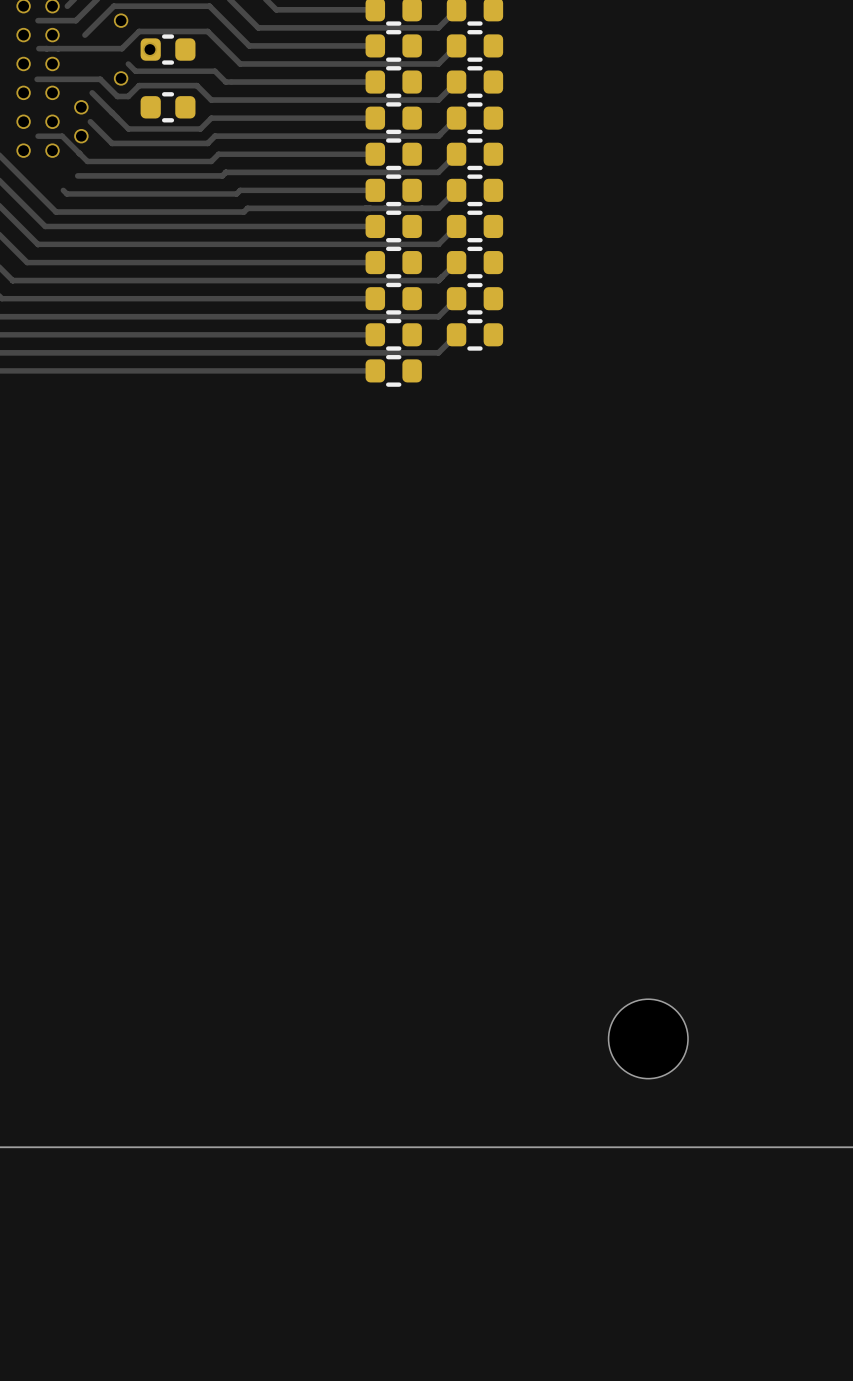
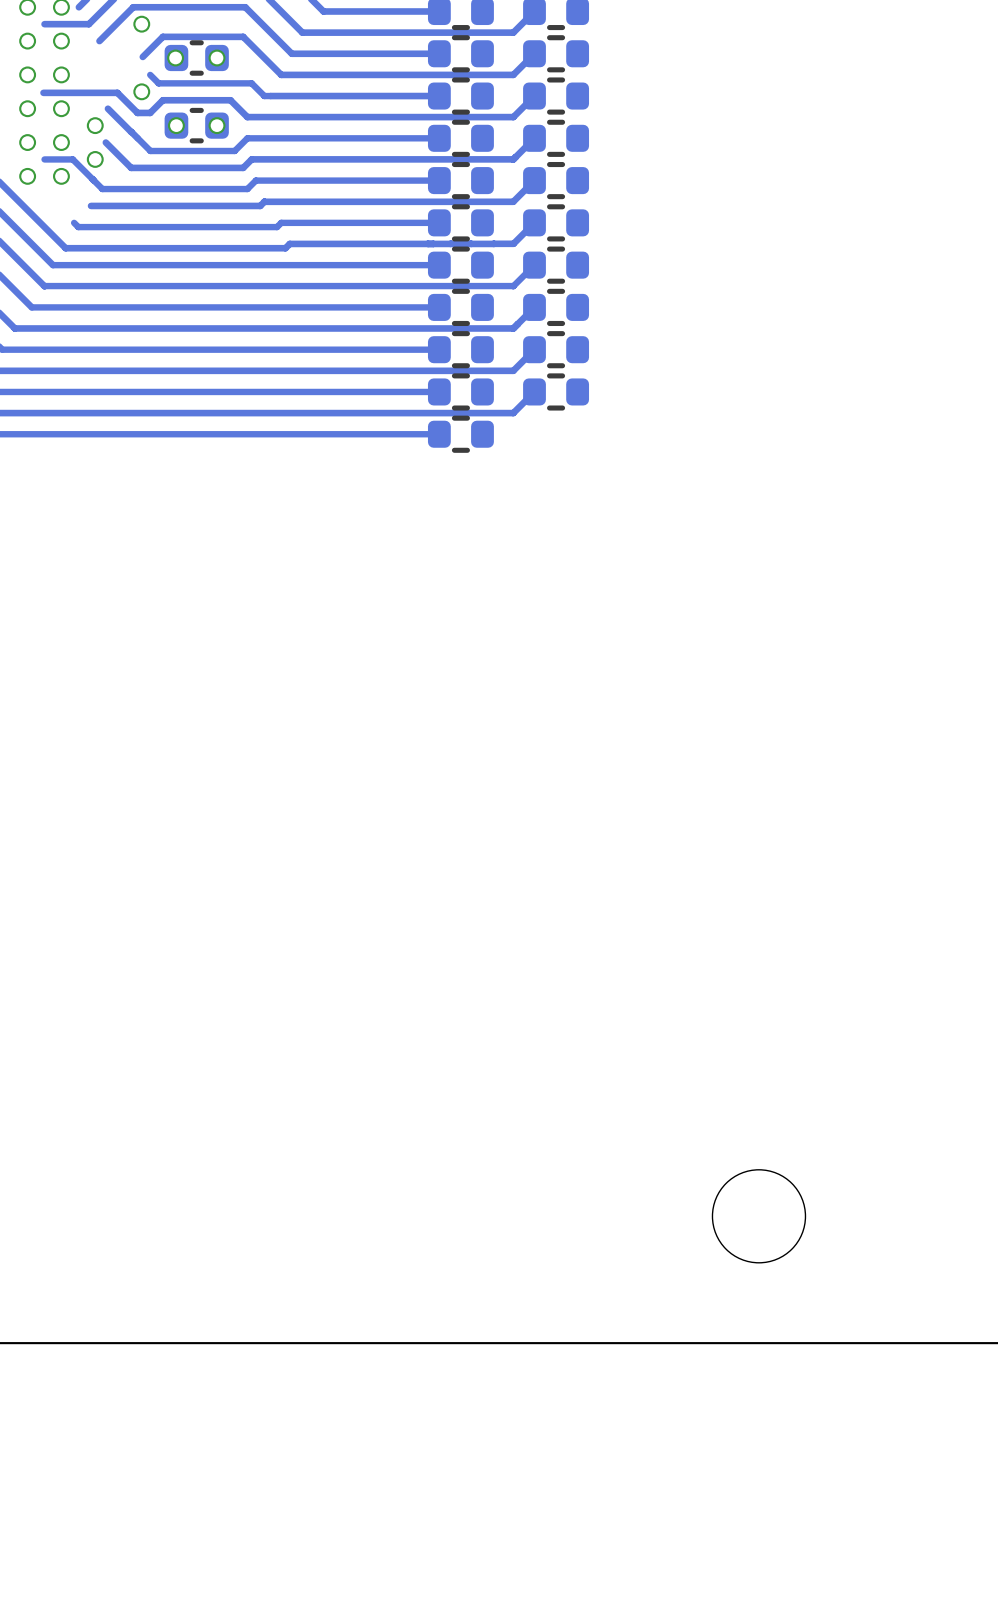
track: (121, 48) (38, 48) -> none
via: none -> (217, 57)
via: none -> (176, 125)
via: none -> (217, 125)

